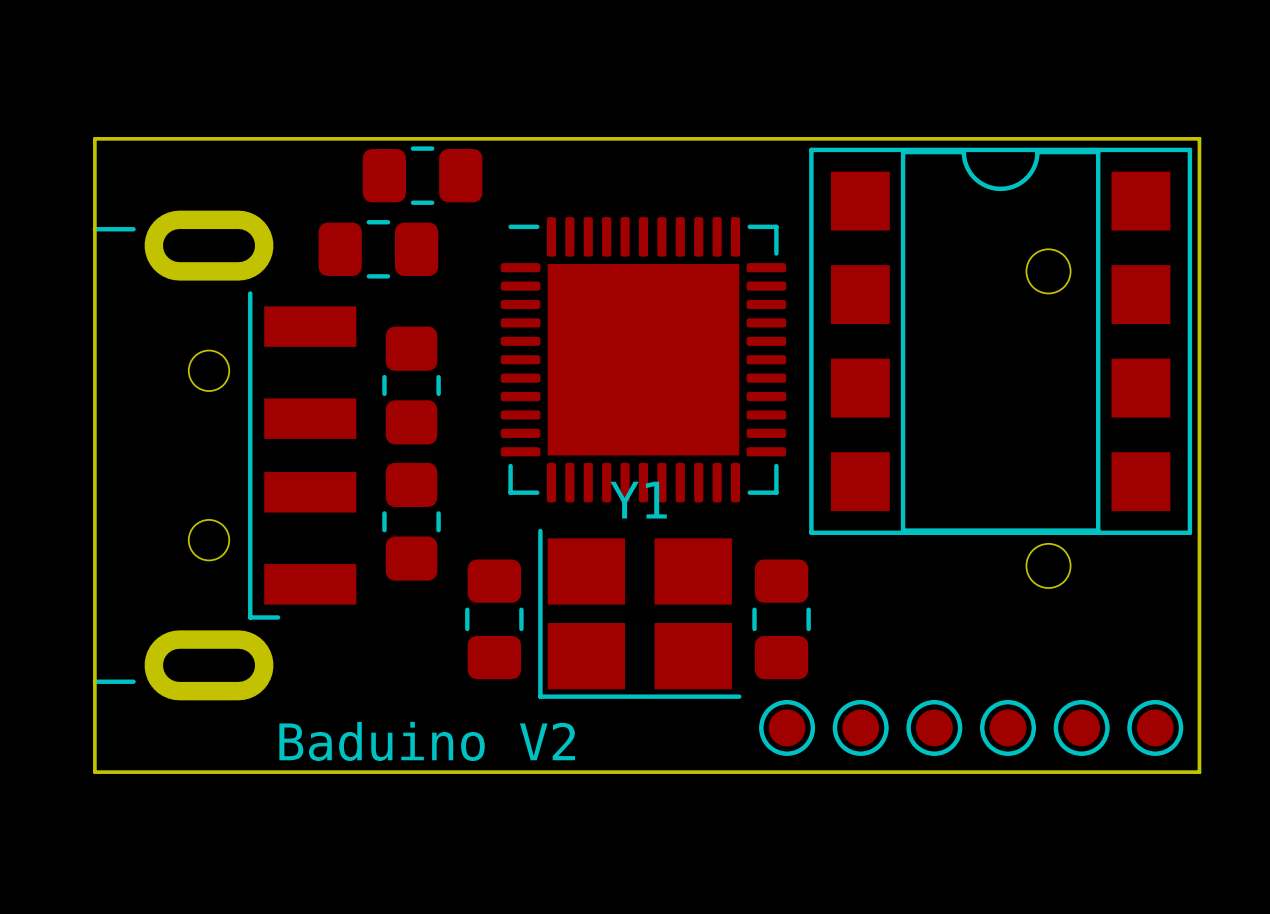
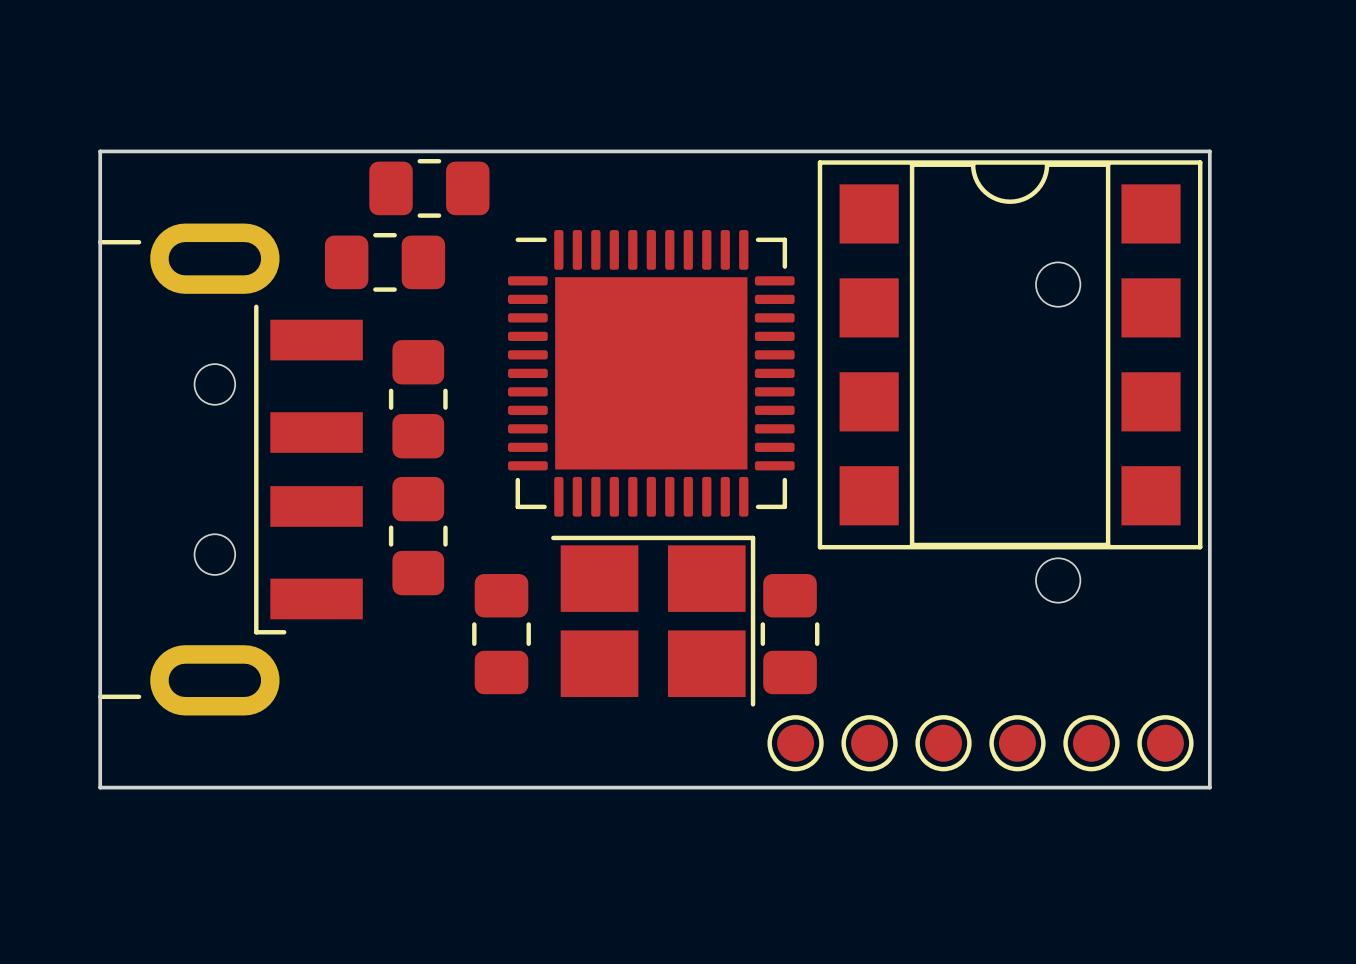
part: none -> (653, 621)
Y1: (639, 613) -> none
text: Baduino V2 (427, 741) -> none

